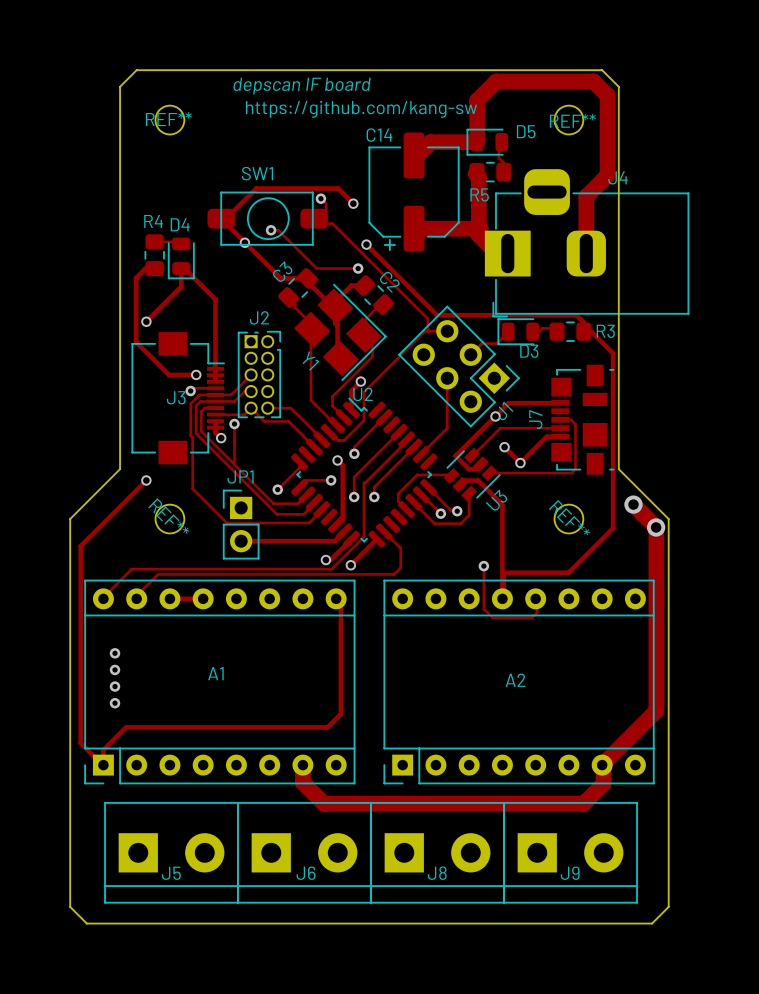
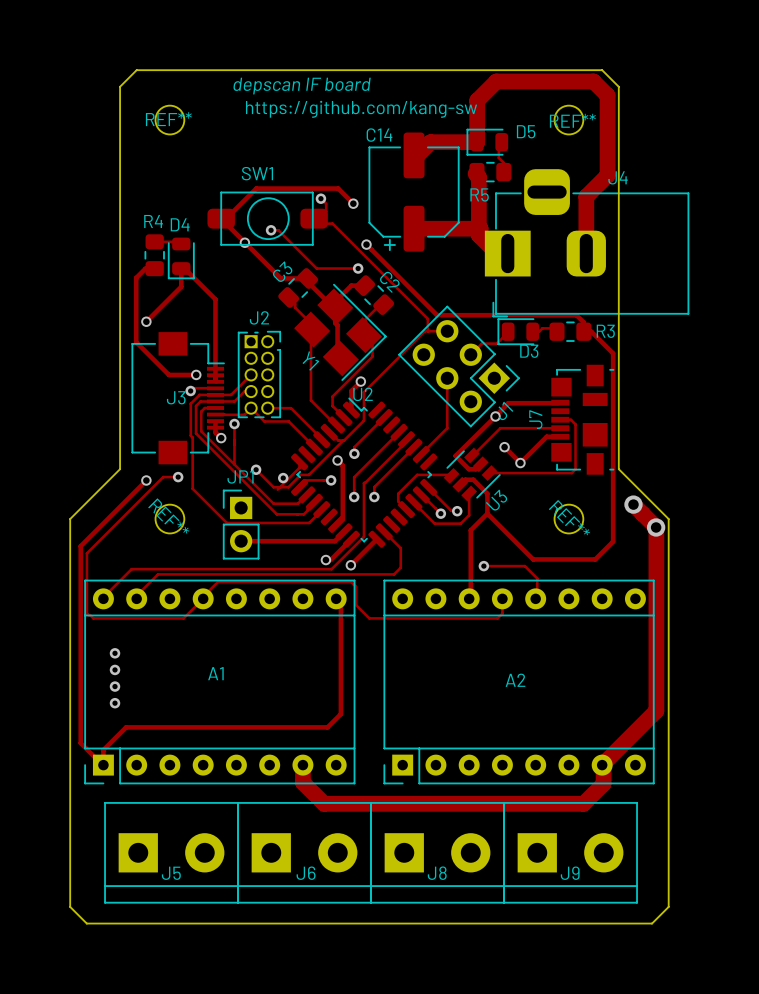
track: none -> (343, 440) (308, 474) (300, 474) (288, 487) (273, 487) (256, 469)
via: none -> (256, 469)
track: none -> (178, 477) (163, 477) (86, 553) (86, 613) (93, 618) (183, 618) (203, 598)
via: none -> (178, 477)
track: (462, 482) (464, 480) (478, 480) (502, 504) (502, 598) -> (203, 596) (218, 581) (351, 581) (356, 586) (356, 605) (369, 618) (497, 618) (502, 613) (502, 598)
track: none -> (460, 484) (465, 479) (473, 479) (487, 493) (487, 513)
via position: (277, 489) -> (283, 478)
track: none -> (487, 513) (470, 530) (470, 600)
track: (613, 528) (568, 572) (504, 572) (503, 599) -> (613, 528) (613, 541) (595, 559) (533, 559) (487, 513)
track: (483, 566) (483, 609) (492, 617) (532, 617) (537, 612) (537, 597) -> (483, 566) (524, 566) (537, 578) (537, 598)
track: (169, 598) (196, 598) -> none

